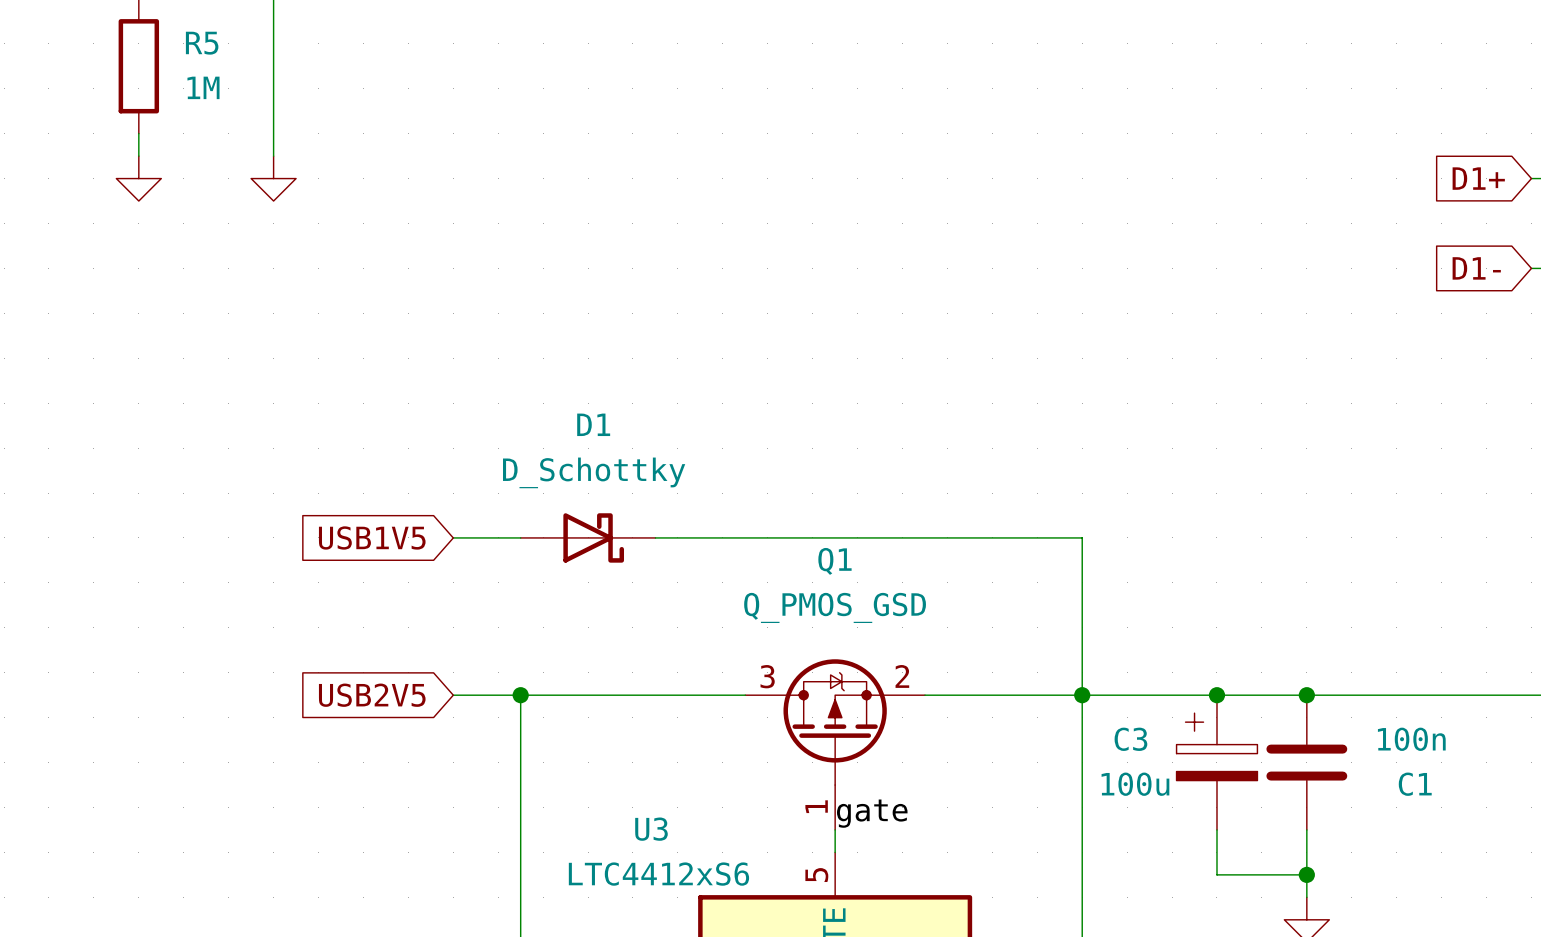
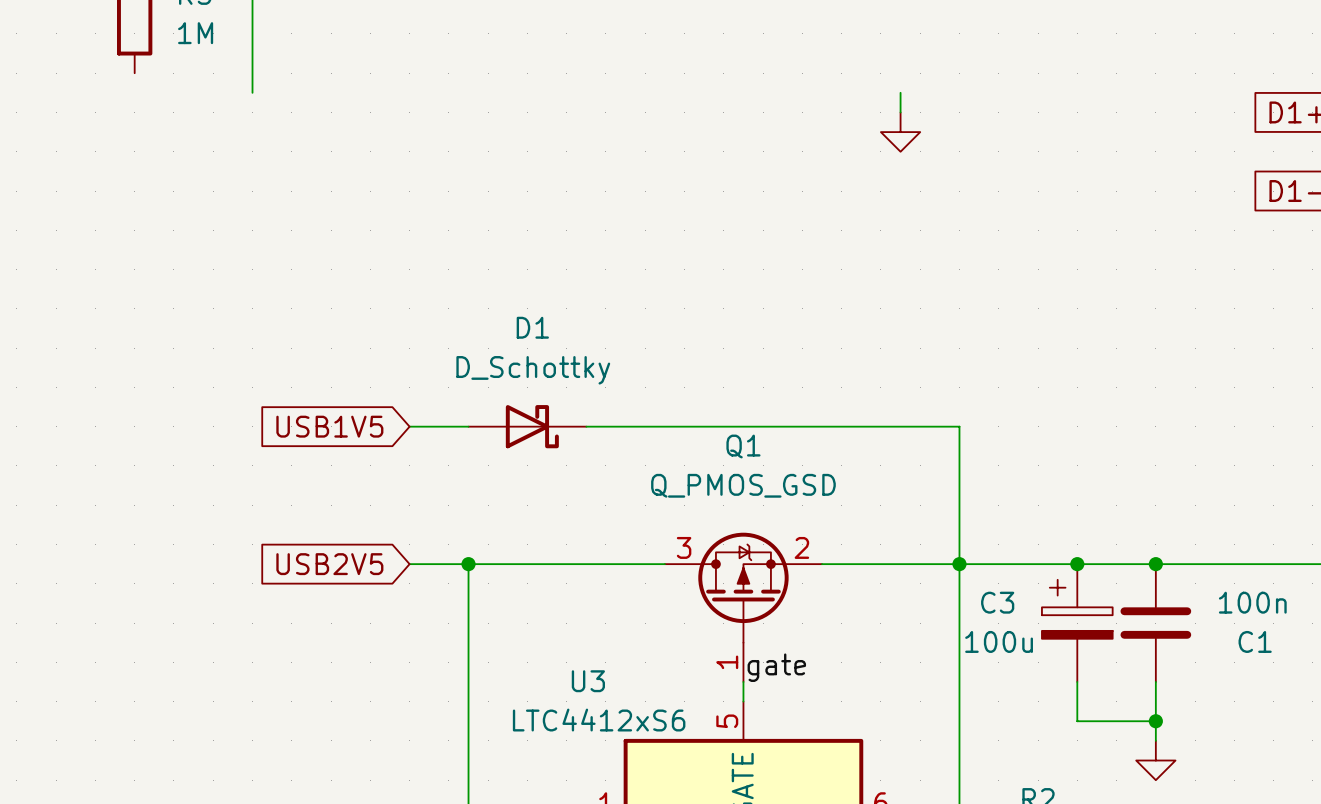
wire: (138, 133) (138, 156) -> none
wire: none -> (900, 92) (900, 112)
power symbol: (138, 178) -> none
power symbol: (273, 178) -> none
power symbol: none -> (900, 132)

